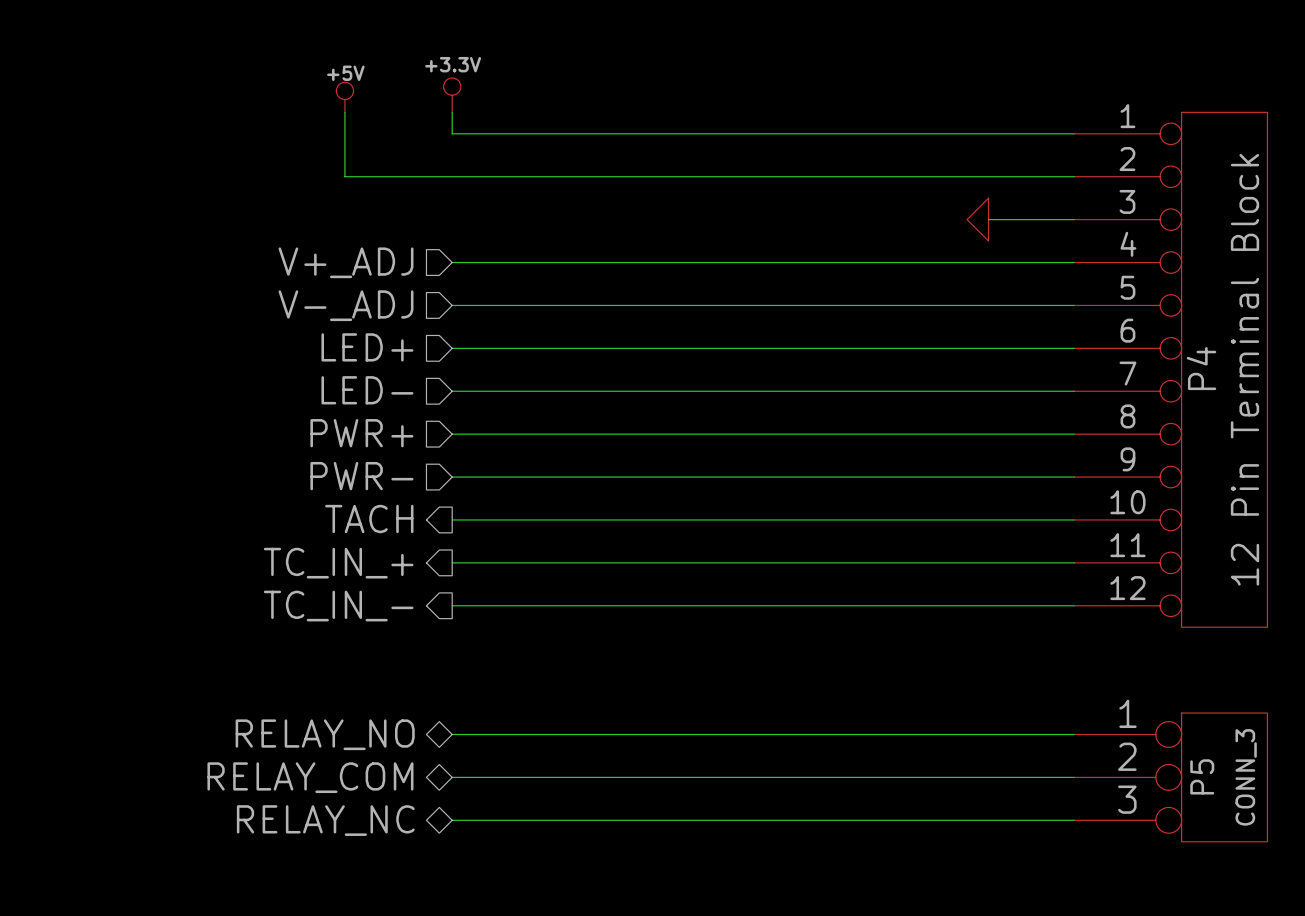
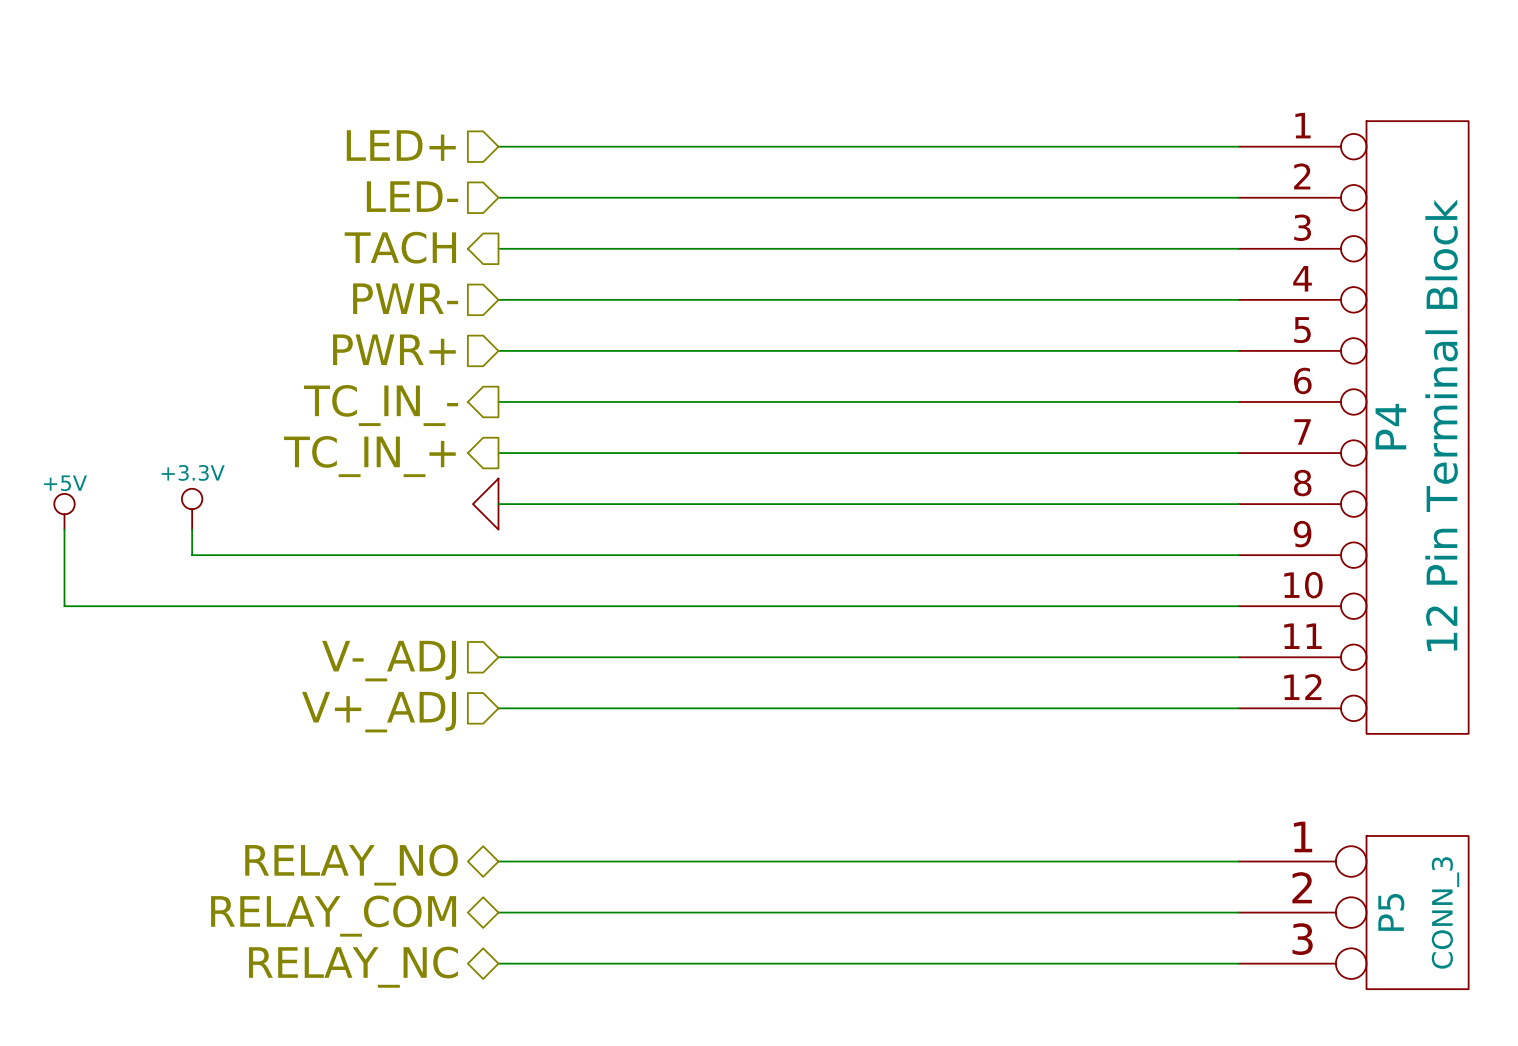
power symbol: +3.3V (452, 95) -> none
power symbol: +5V (344, 97) -> none
wire: (344, 112) (344, 176) (452, 176) -> none
wire: (452, 112) (452, 133) -> none
hierarchical label: none -> LED+ (401, 145)
hierarchical label: none -> LED- (412, 196)
wire: none -> (498, 248) (1136, 248)
power symbol: (977, 219) -> none
hierarchical label: V+_ADJ (346, 262) -> PWR- (405, 298)
hierarchical label: V-_ADJ (346, 305) -> PWR+ (394, 349)
hierarchical label shape: input (367, 347) -> output (381, 405)
hierarchical label: LED+ (367, 347) -> TC_IN_- (381, 405)
hierarchical label shape: input (367, 390) -> output (369, 456)
hierarchical label: LED- (367, 390) -> TC_IN_+ (369, 456)
hierarchical label: PWR+ (361, 433) -> none
power symbol: none -> (485, 504)
power symbol: none -> +3.3V (192, 509)
power symbol: none -> +5V (64, 511)
wire: none -> (64, 529) (64, 606) (498, 606)
wire: none -> (192, 529) (192, 555) (498, 555)
hierarchical label: PWR- (361, 476) -> none
hierarchical label position: TACH (369, 519) -> TACH (400, 247)
hierarchical label shape: output (338, 563) -> input (389, 661)
hierarchical label: TC_IN_+ (338, 563) -> V-_ADJ (389, 661)
hierarchical label shape: output (338, 606) -> input (379, 712)
hierarchical label: TC_IN_- (338, 606) -> V+_ADJ (379, 712)

